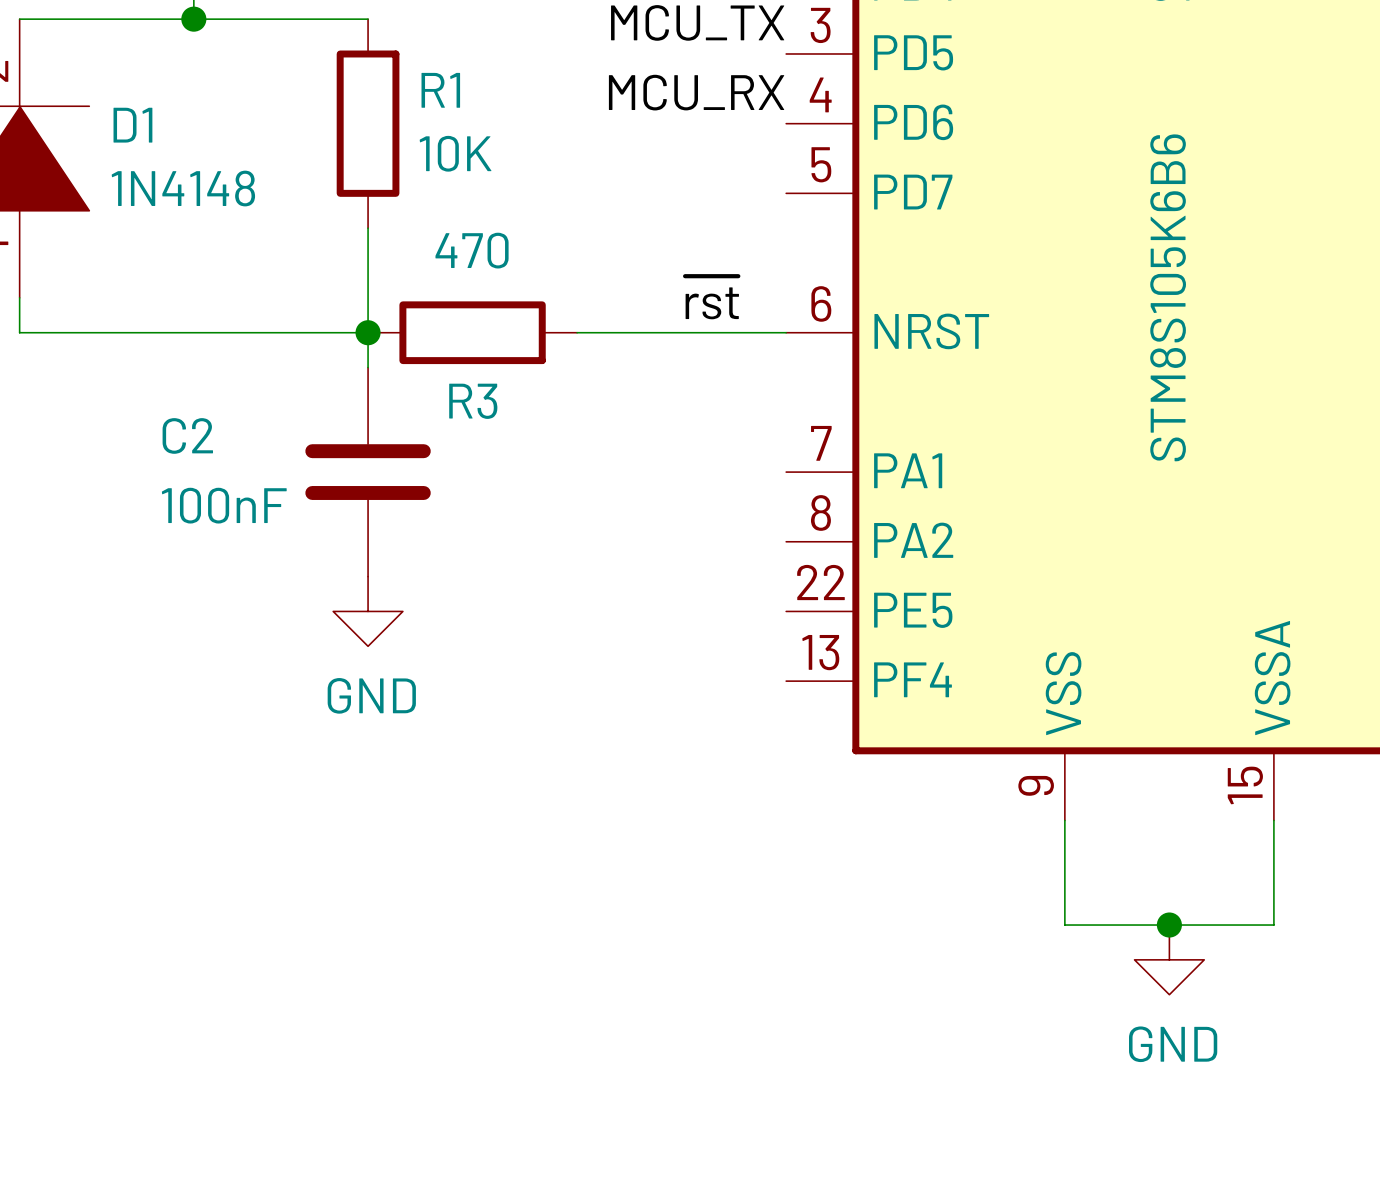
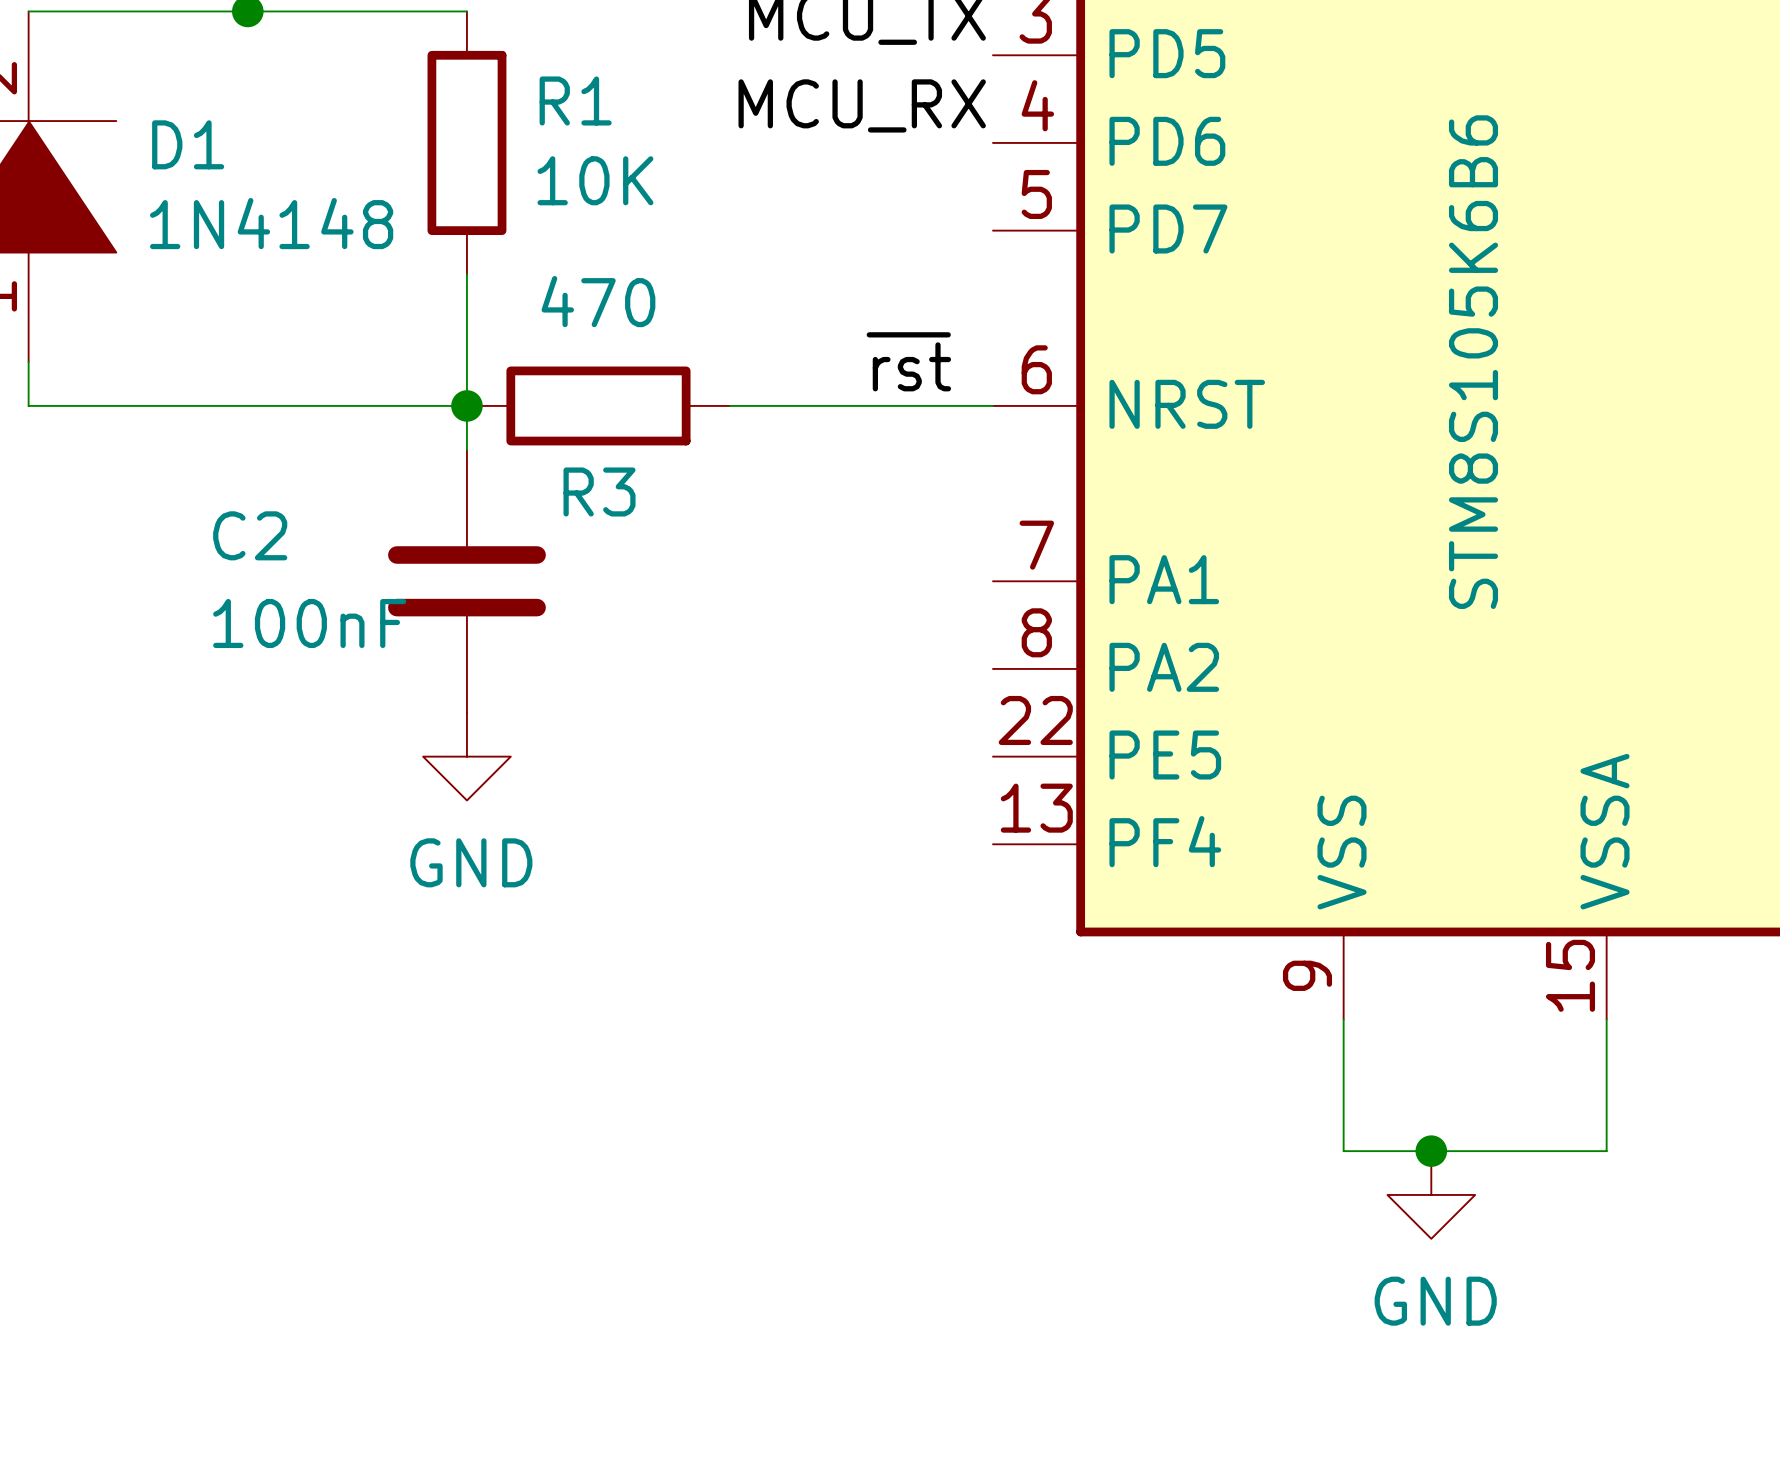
junction position: (1169, 925) -> (1431, 1151)
power symbol position: GND (1169, 959) -> GND (1431, 1194)

